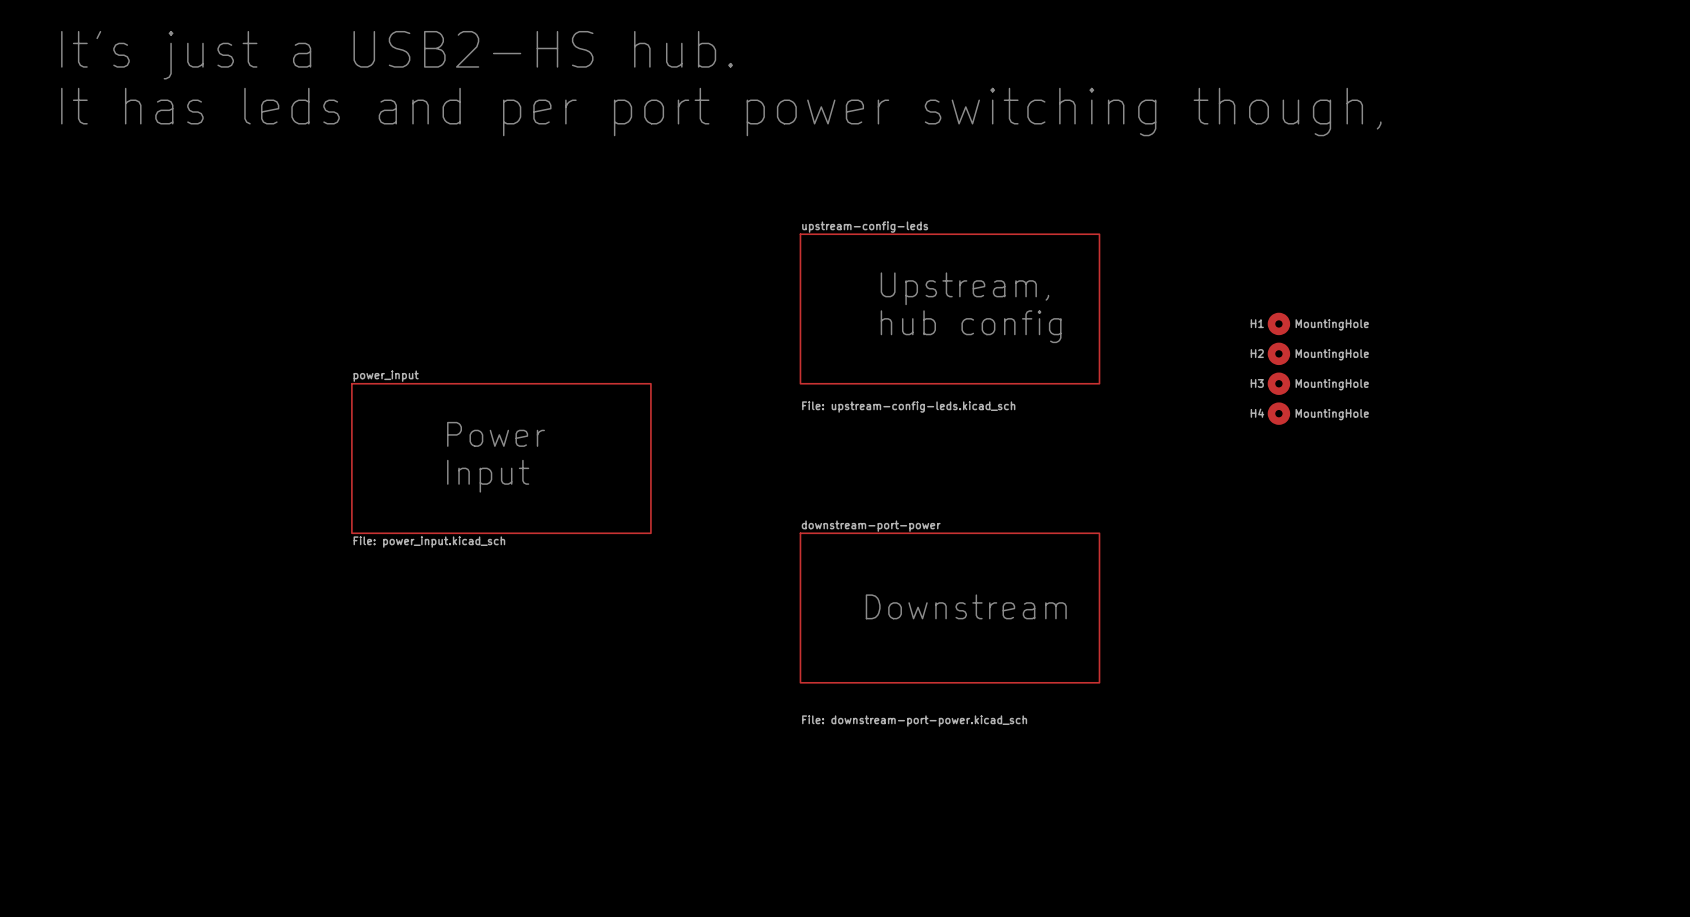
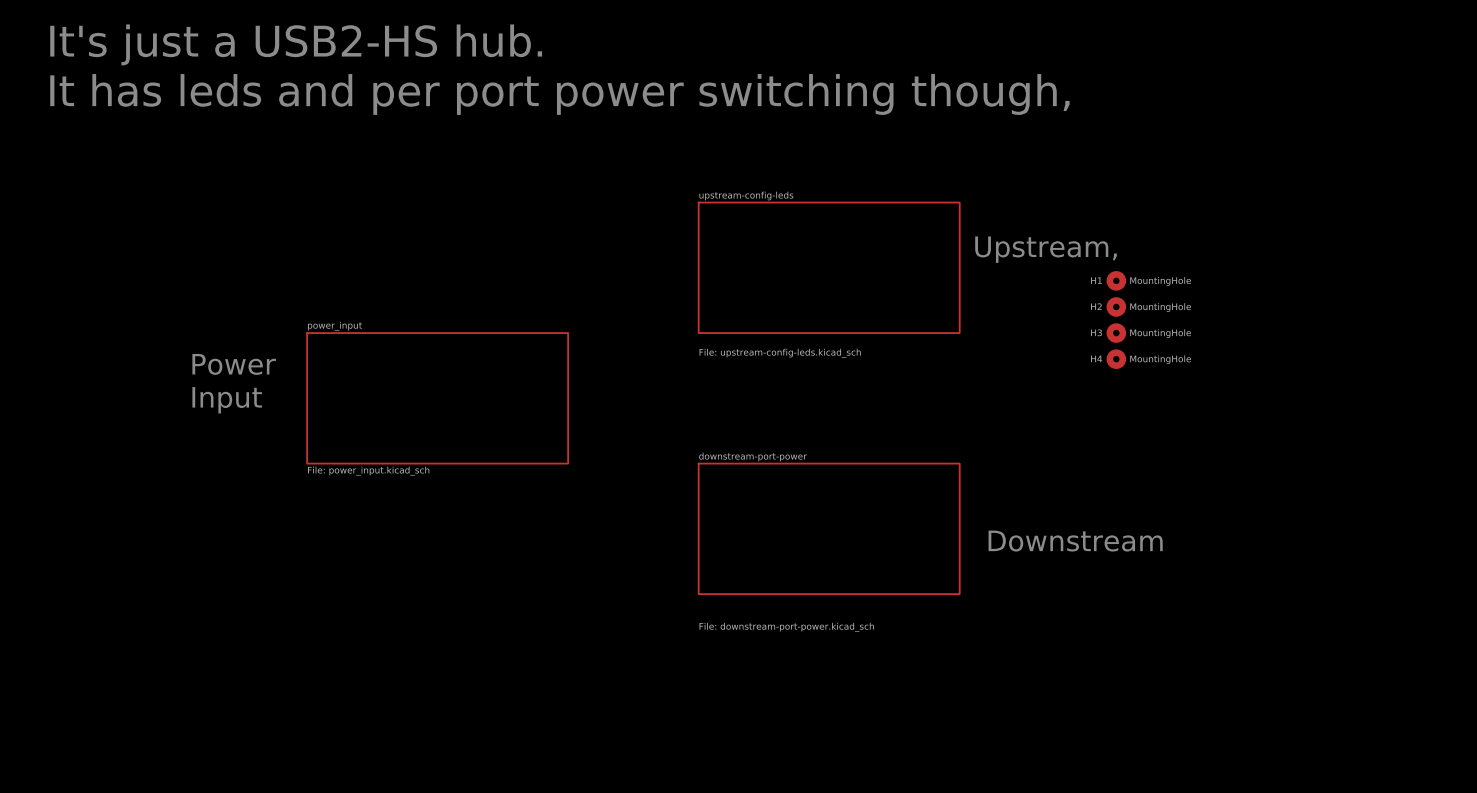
text: Upstream, (964, 288) -> none
text: none -> Upstream, (1046, 249)
text: hub config (971, 326) -> none
text: none -> Power (234, 364)
text: Power (496, 434) -> none
text: none -> Input (227, 400)
text: Input (488, 476) -> none
text: Downstream (966, 606) -> none
text: none -> Downstream (1075, 541)

